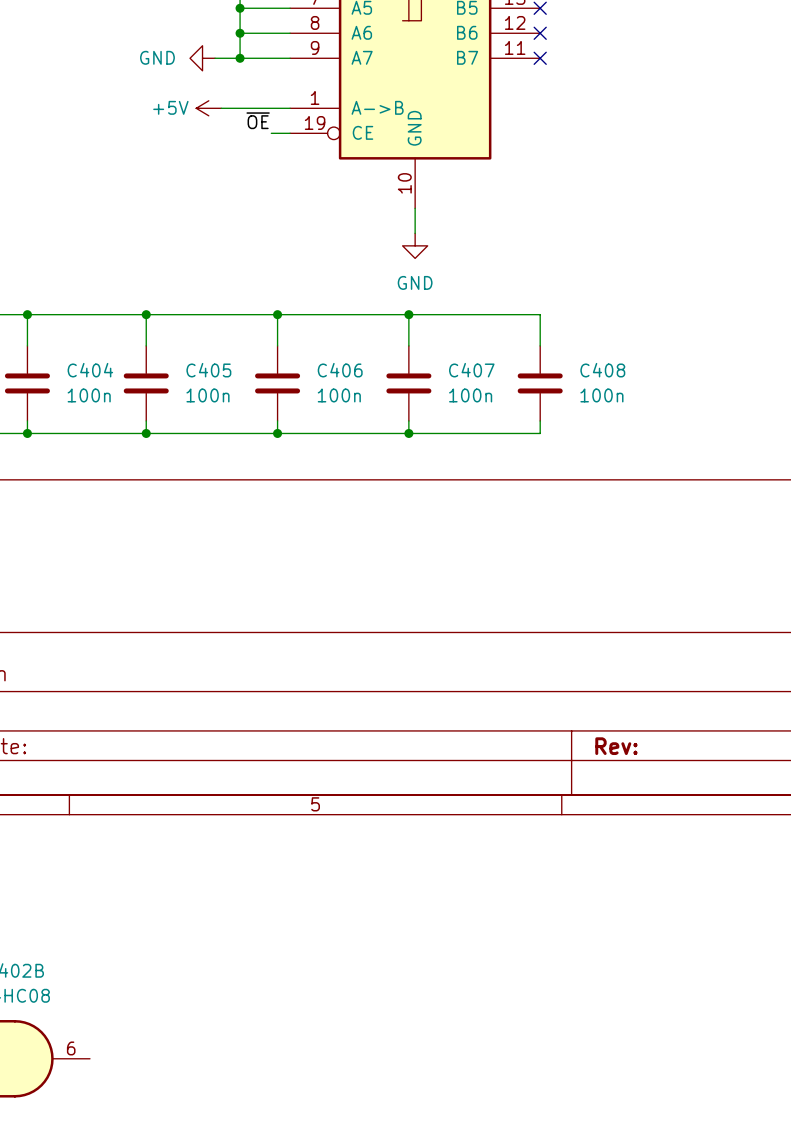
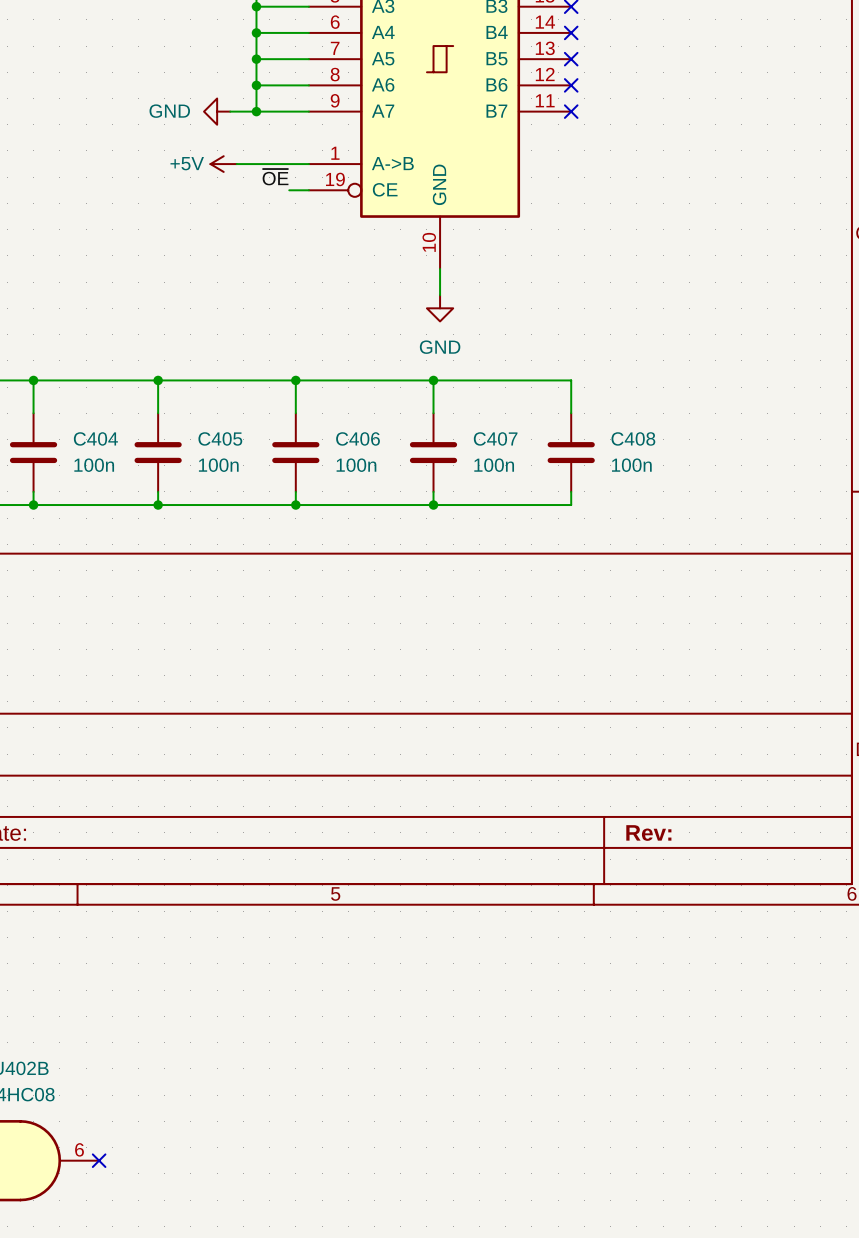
no-connect mark: none -> (99, 1160)

